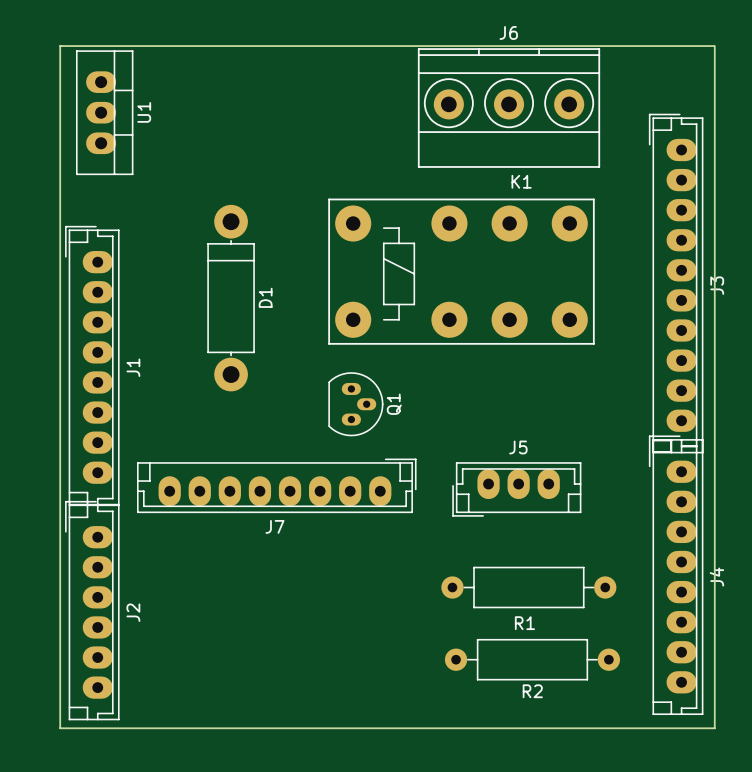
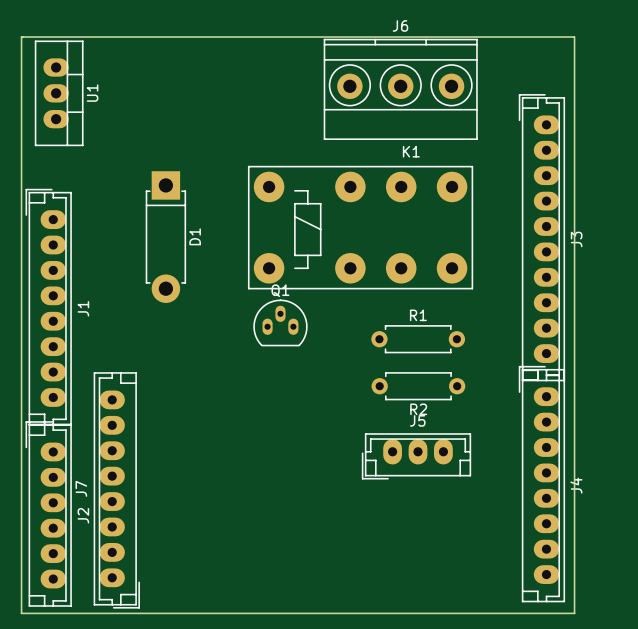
D1 footprint: [207, 204, 255, 392] -> [145, 171, 186, 303]
Q1 rotation: 0° (355, 404) -> 90° counterclockwise (280, 322)
J7 rotation: 0° (276, 485) -> 90° clockwise (116, 490)
J5 position: (516, 489) -> (416, 456)
R1 footprint: [441, 566, 617, 609] -> [371, 325, 466, 354]
R1 name position: R1 (524, 623) -> R1 (418, 315)
R2 footprint: [444, 639, 621, 681] -> [371, 372, 466, 401]

